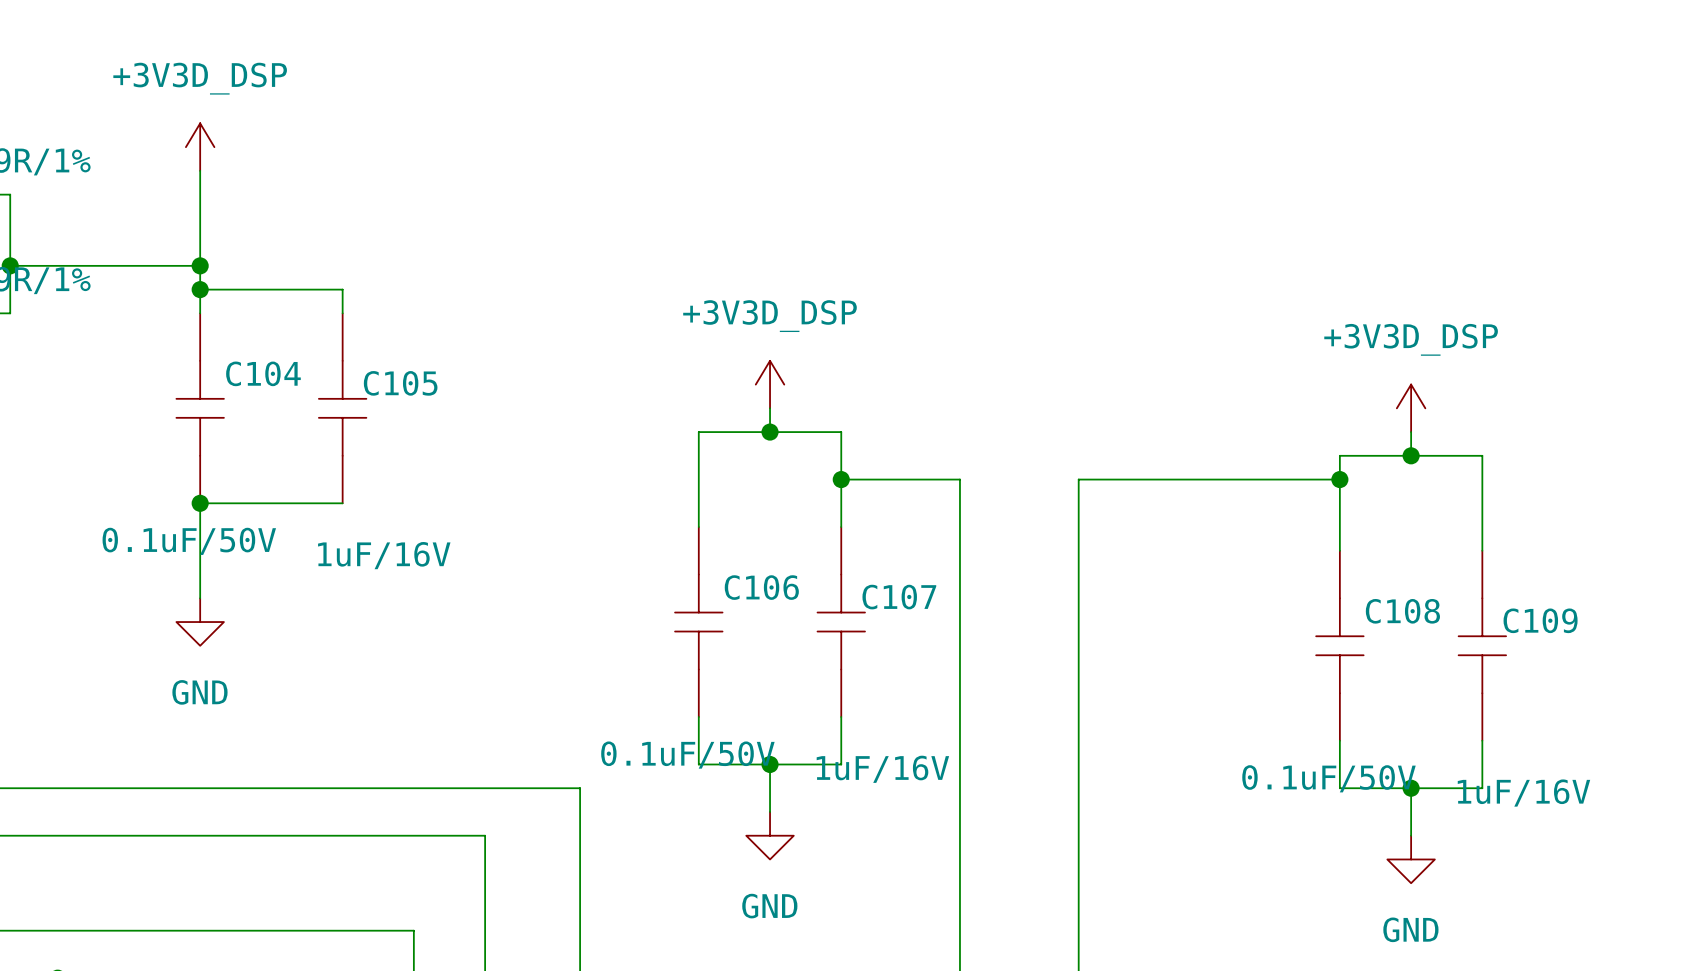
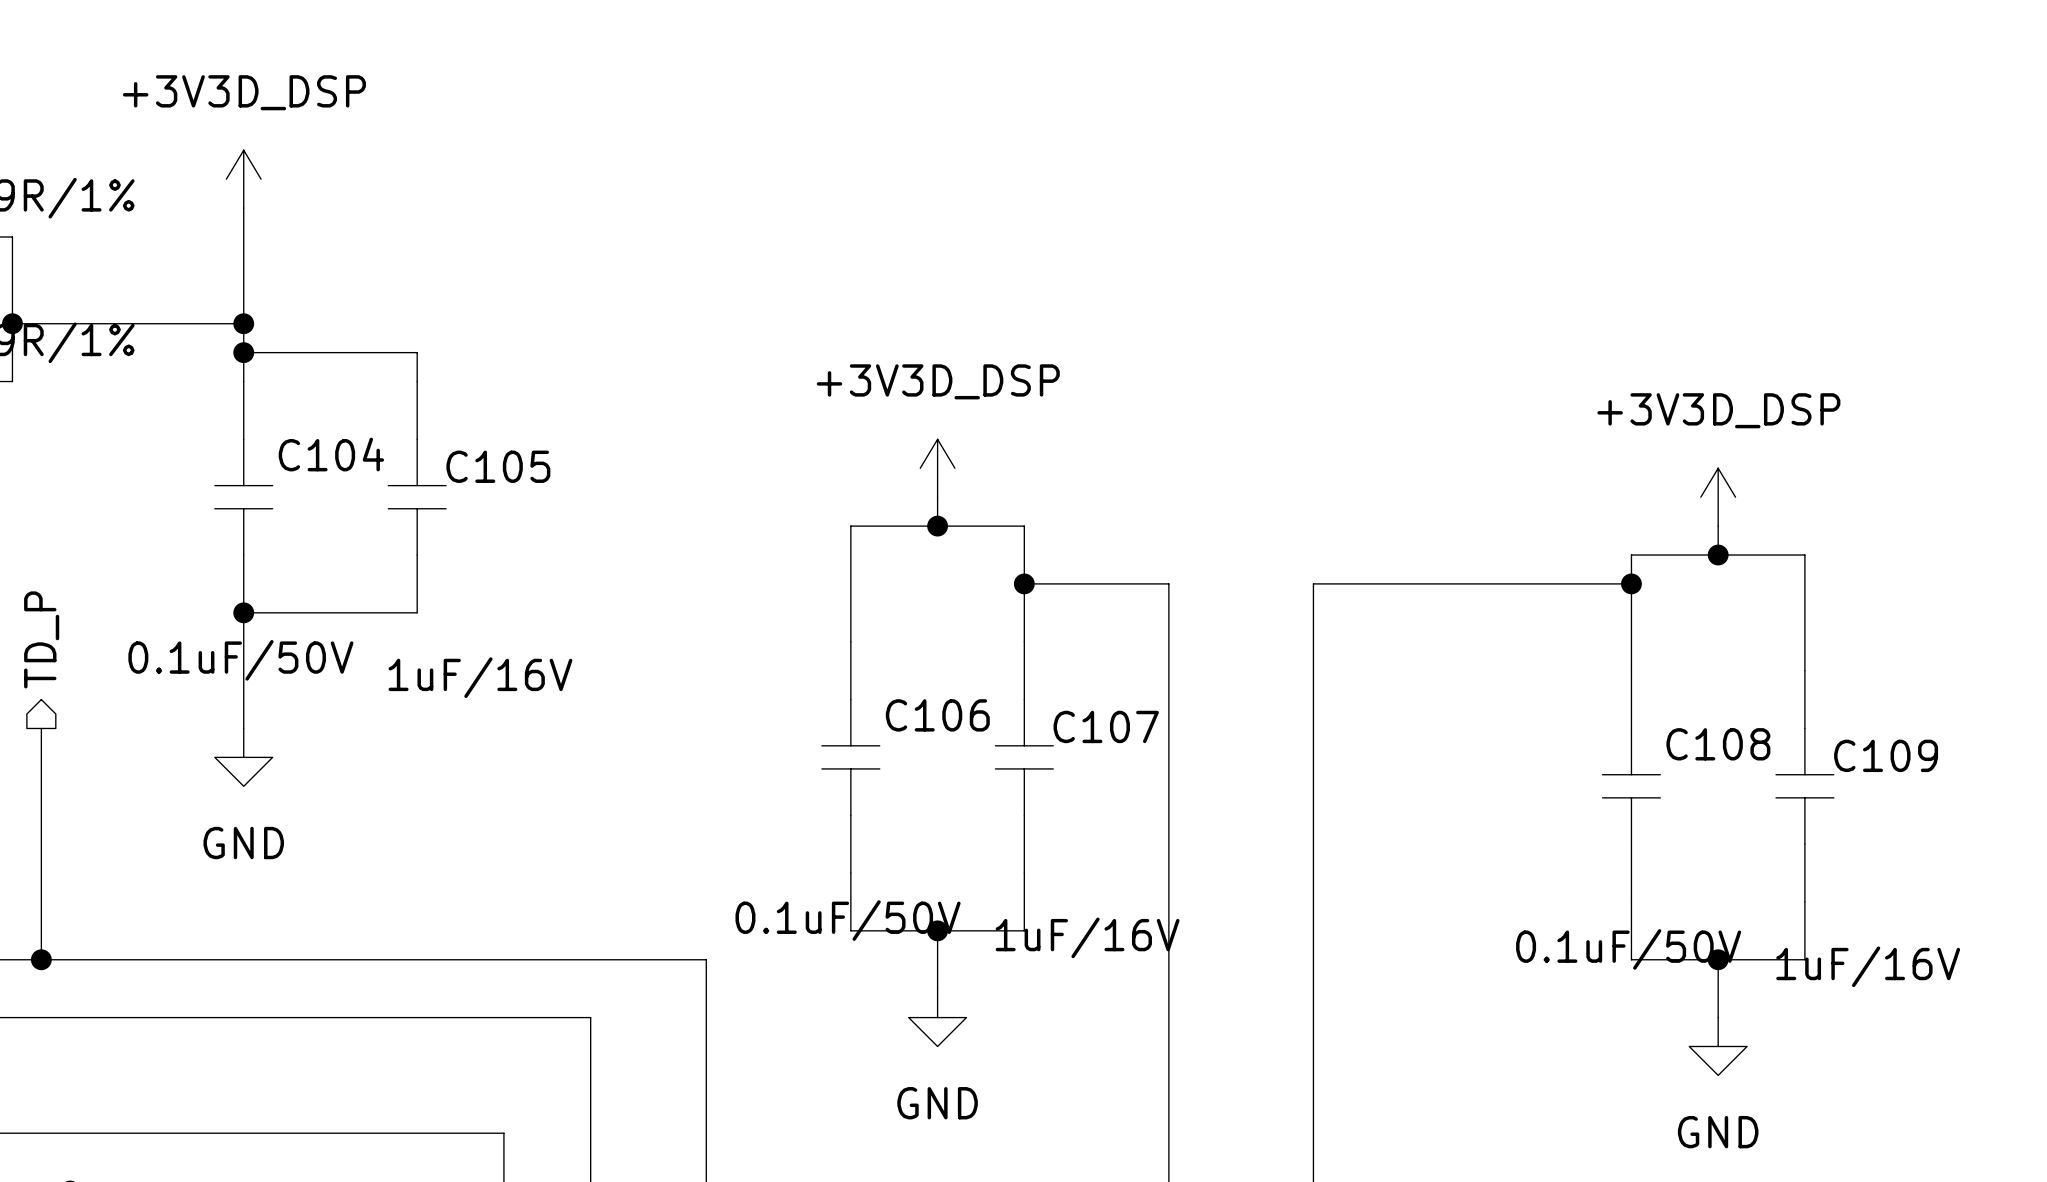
hierarchical label: none -> TD_P (41, 639)
wire: none -> (41, 728) (41, 959)
junction: none -> (41, 959)

